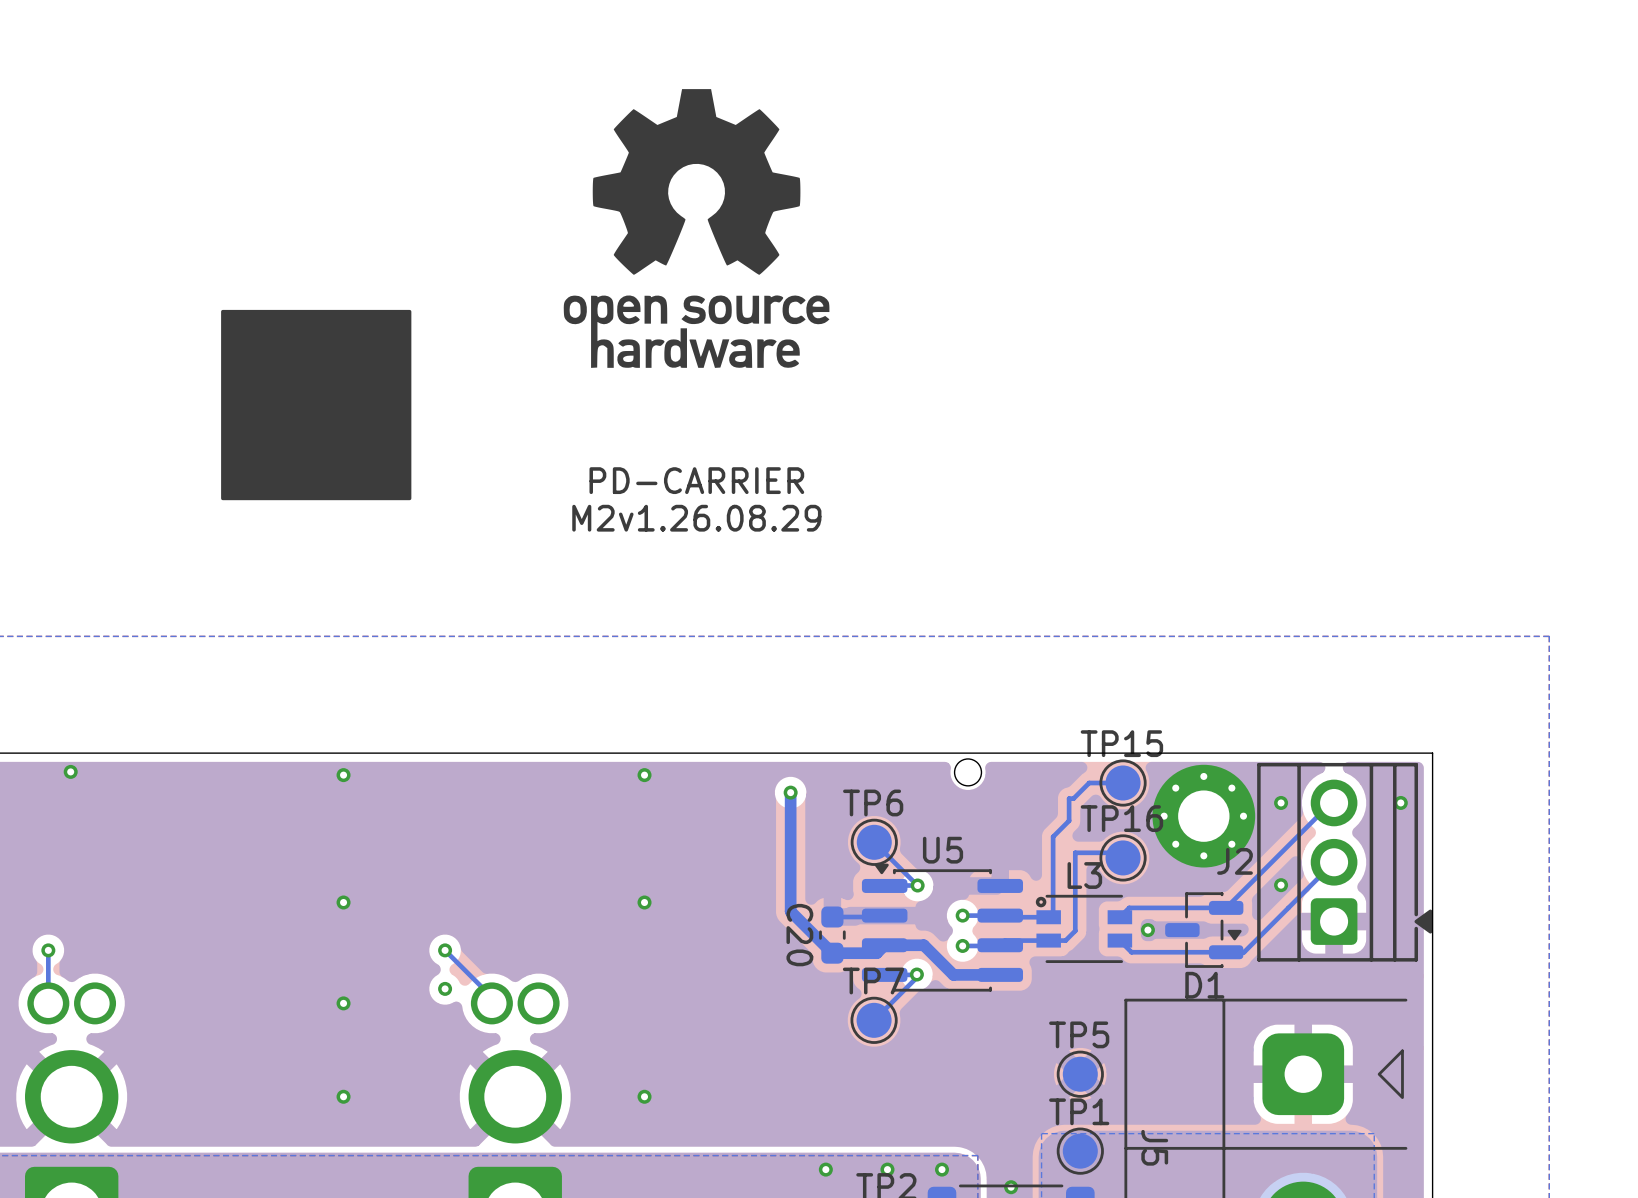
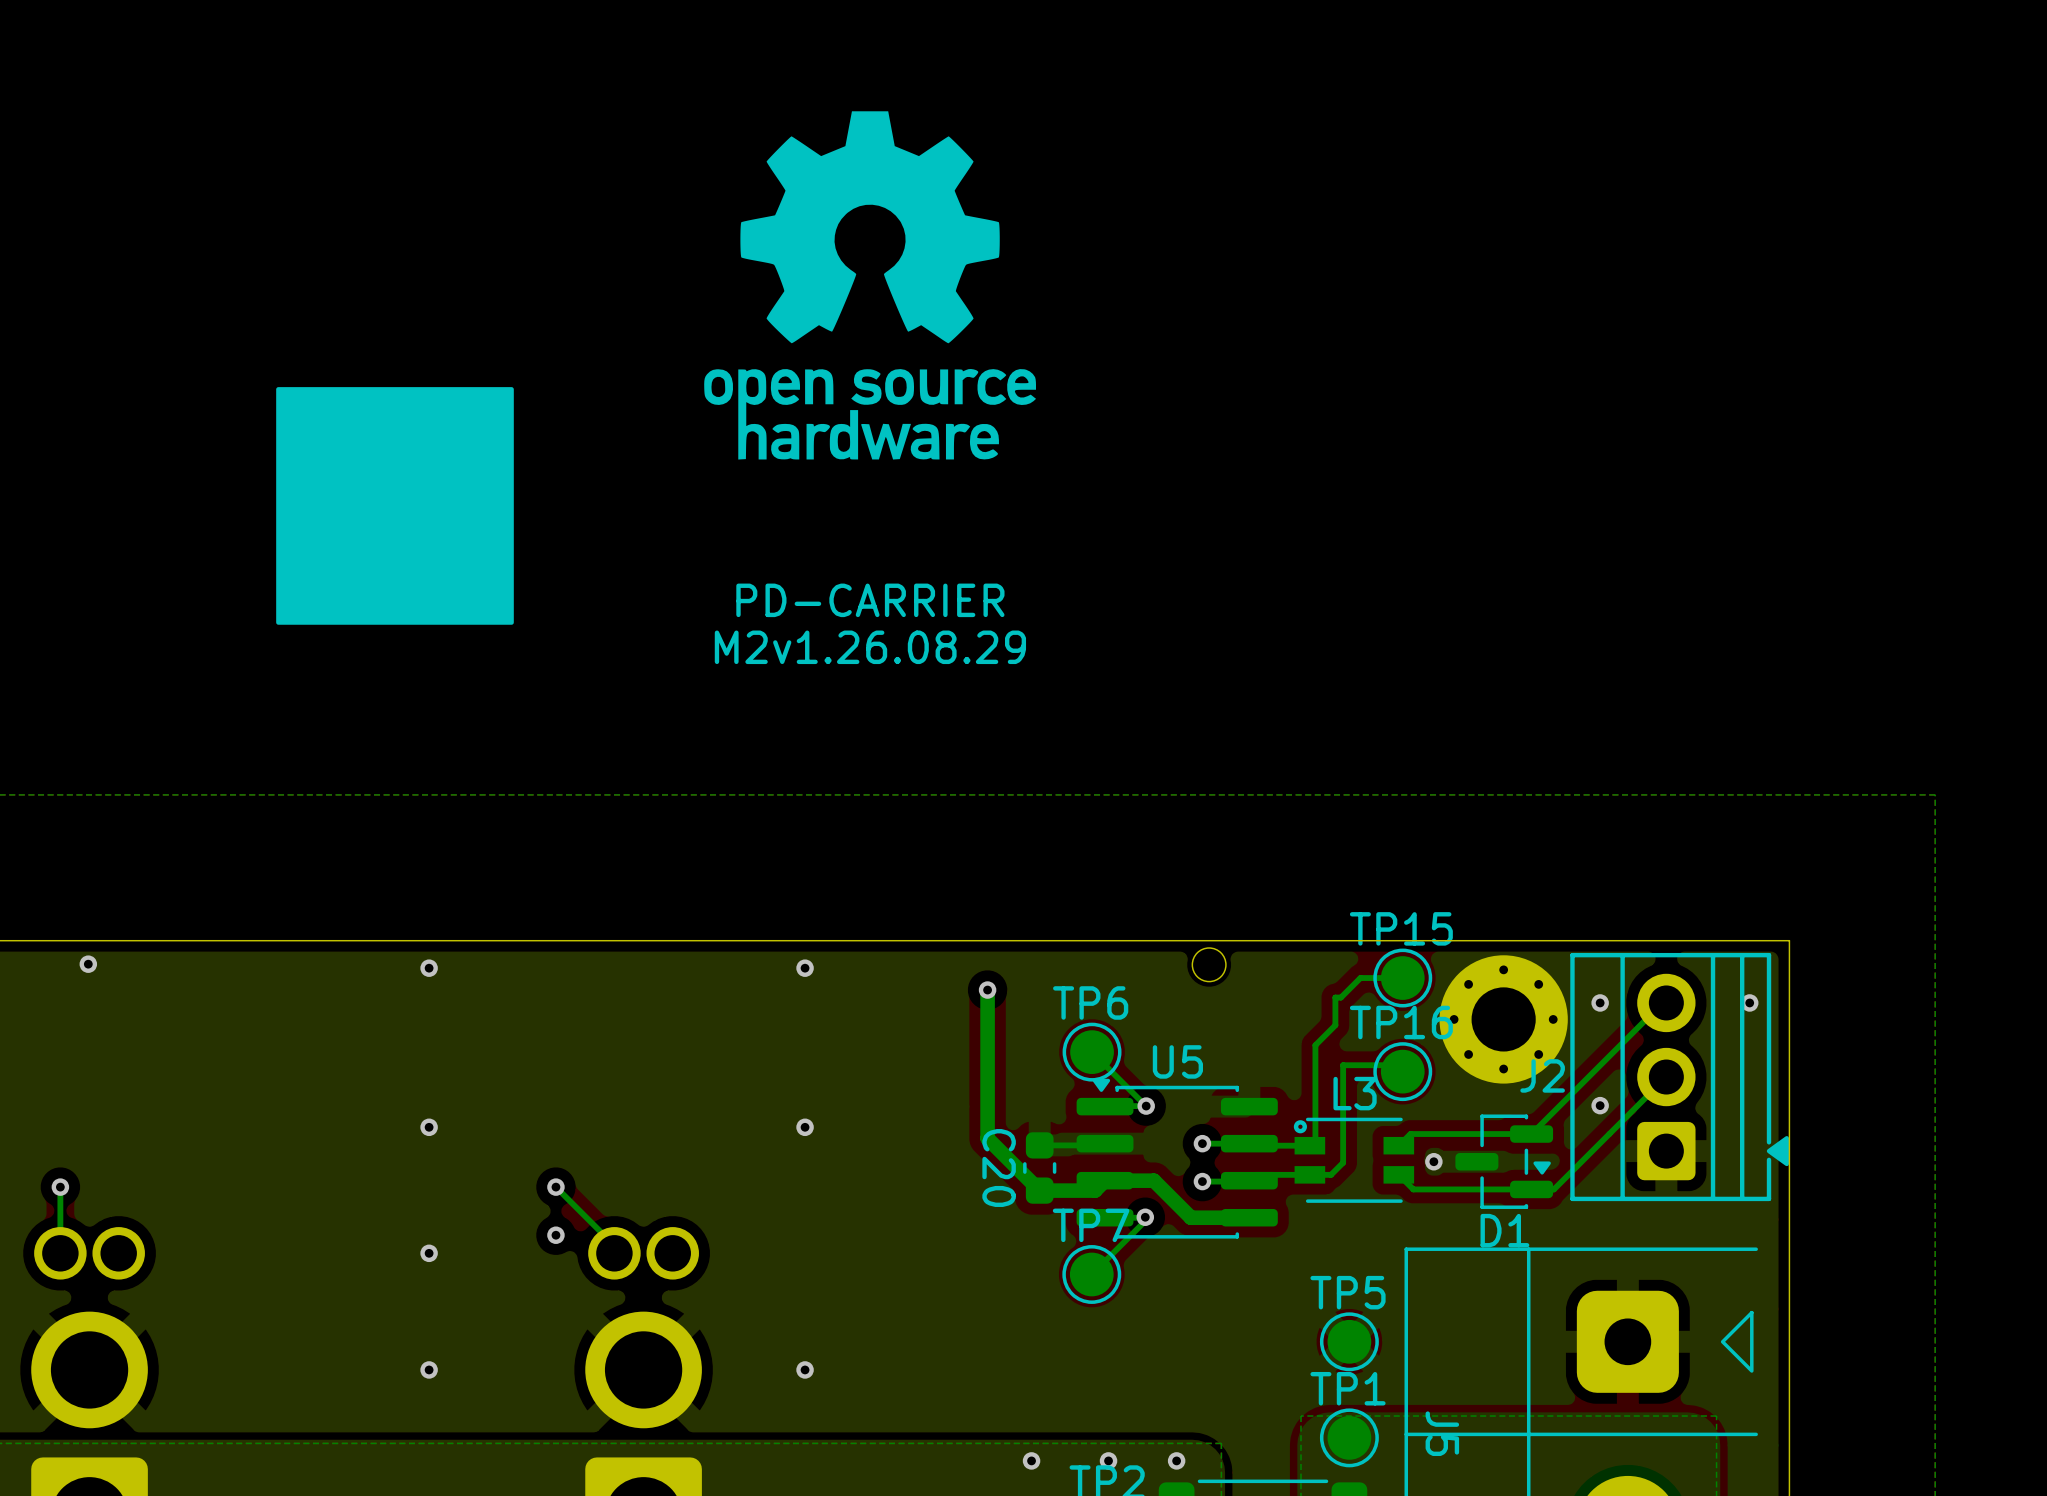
via: (1011, 1187) -> none

